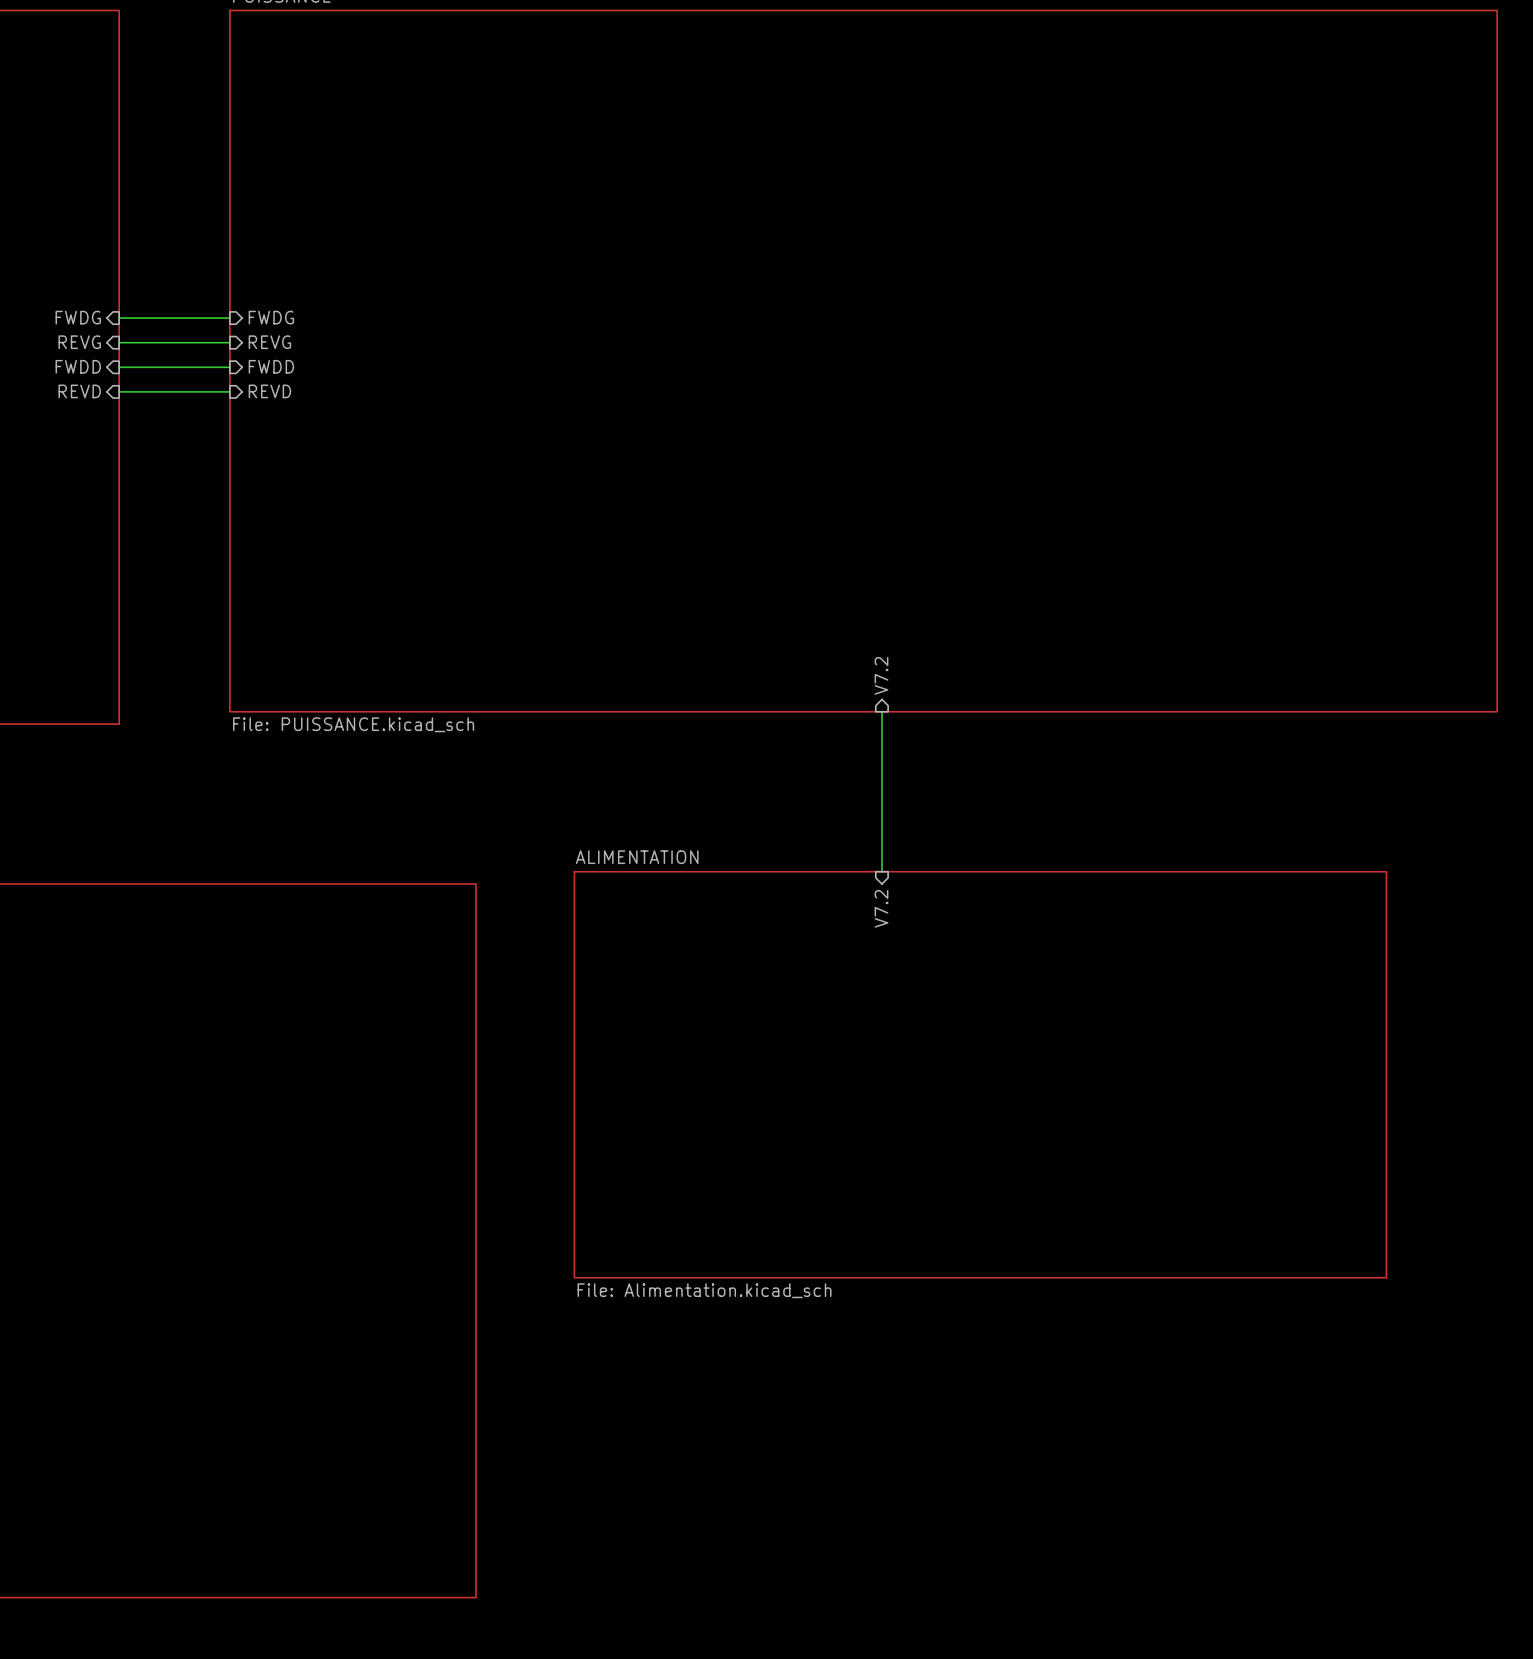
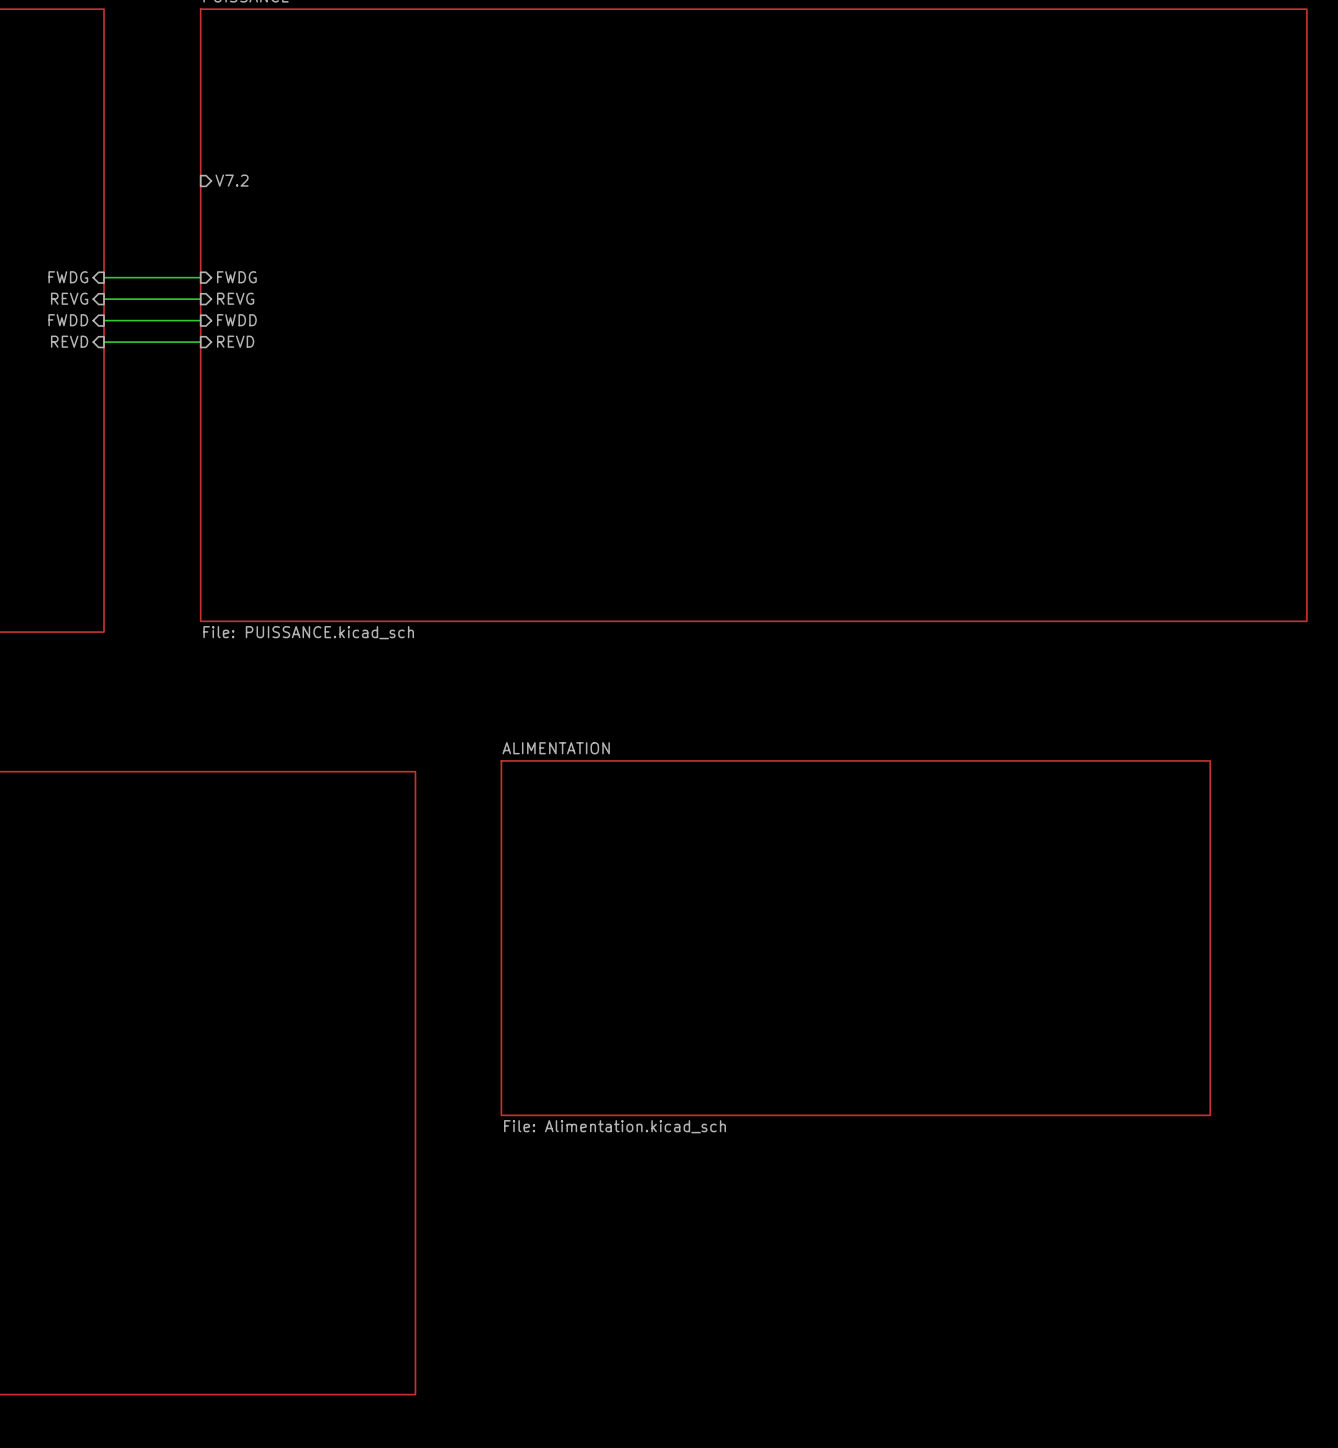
sheet pin: none -> V7.2 (232, 180)
sheet pin: V7.2 (881, 675) -> none
wire: (881, 711) (881, 871) -> none
sheet pin: V7.2 (881, 908) -> none

